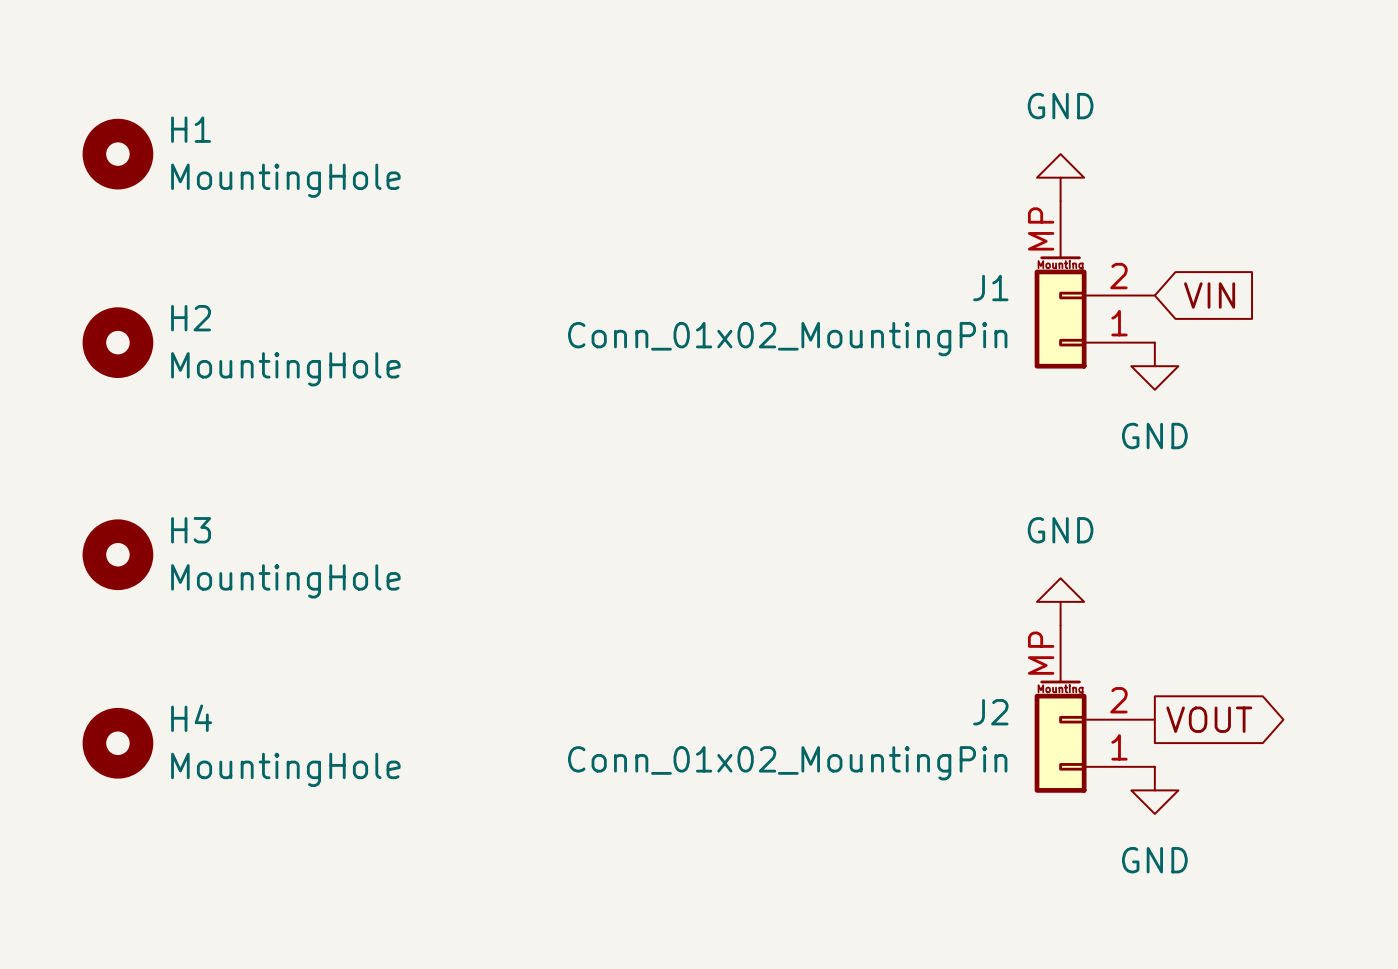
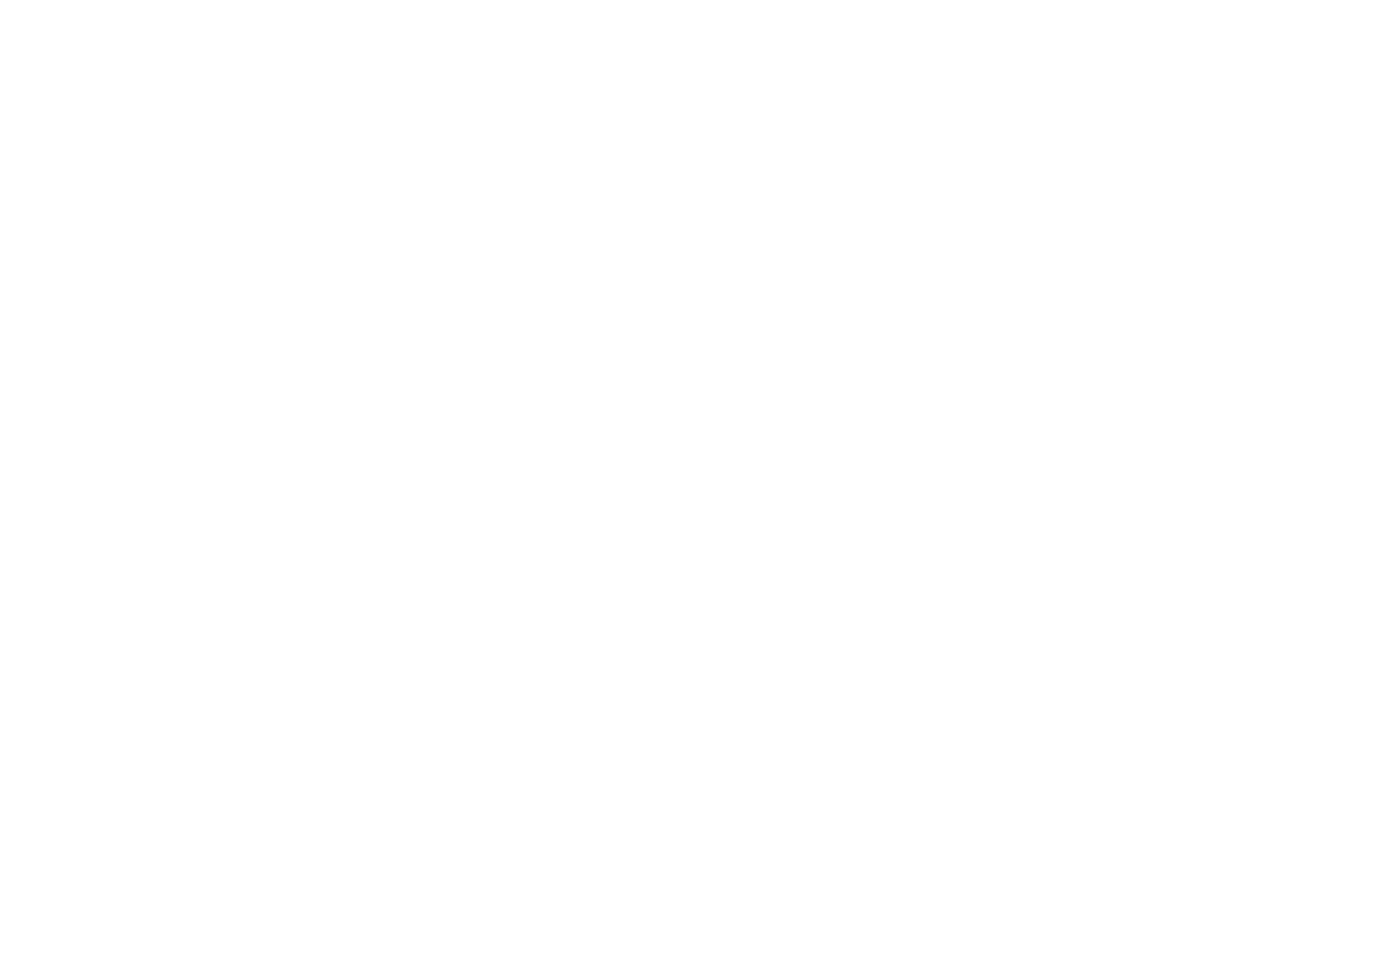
H1: MountingHole (117, 154) -> none
power symbol: GND (1060, 177) -> none
J1: Conn_01x02_MountingPin (1094, 284) -> none
global label: VIN (1209, 295) -> none
H2: MountingHole (117, 342) -> none
power symbol: GND (1154, 366) -> none
H3: MountingHole (117, 554) -> none
power symbol: GND (1060, 601) -> none
J2: Conn_01x02_MountingPin (1094, 709) -> none
global label: VOUT (1209, 719) -> none
H4: MountingHole (117, 743) -> none
power symbol: GND (1154, 790) -> none

